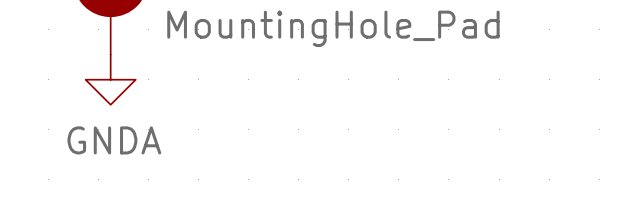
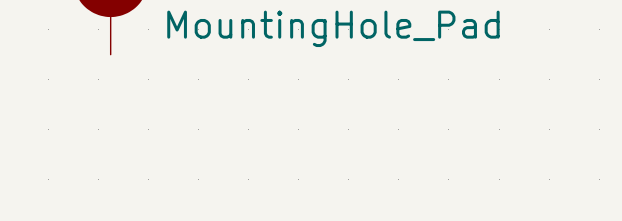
power symbol: GNDA (110, 79) -> none

